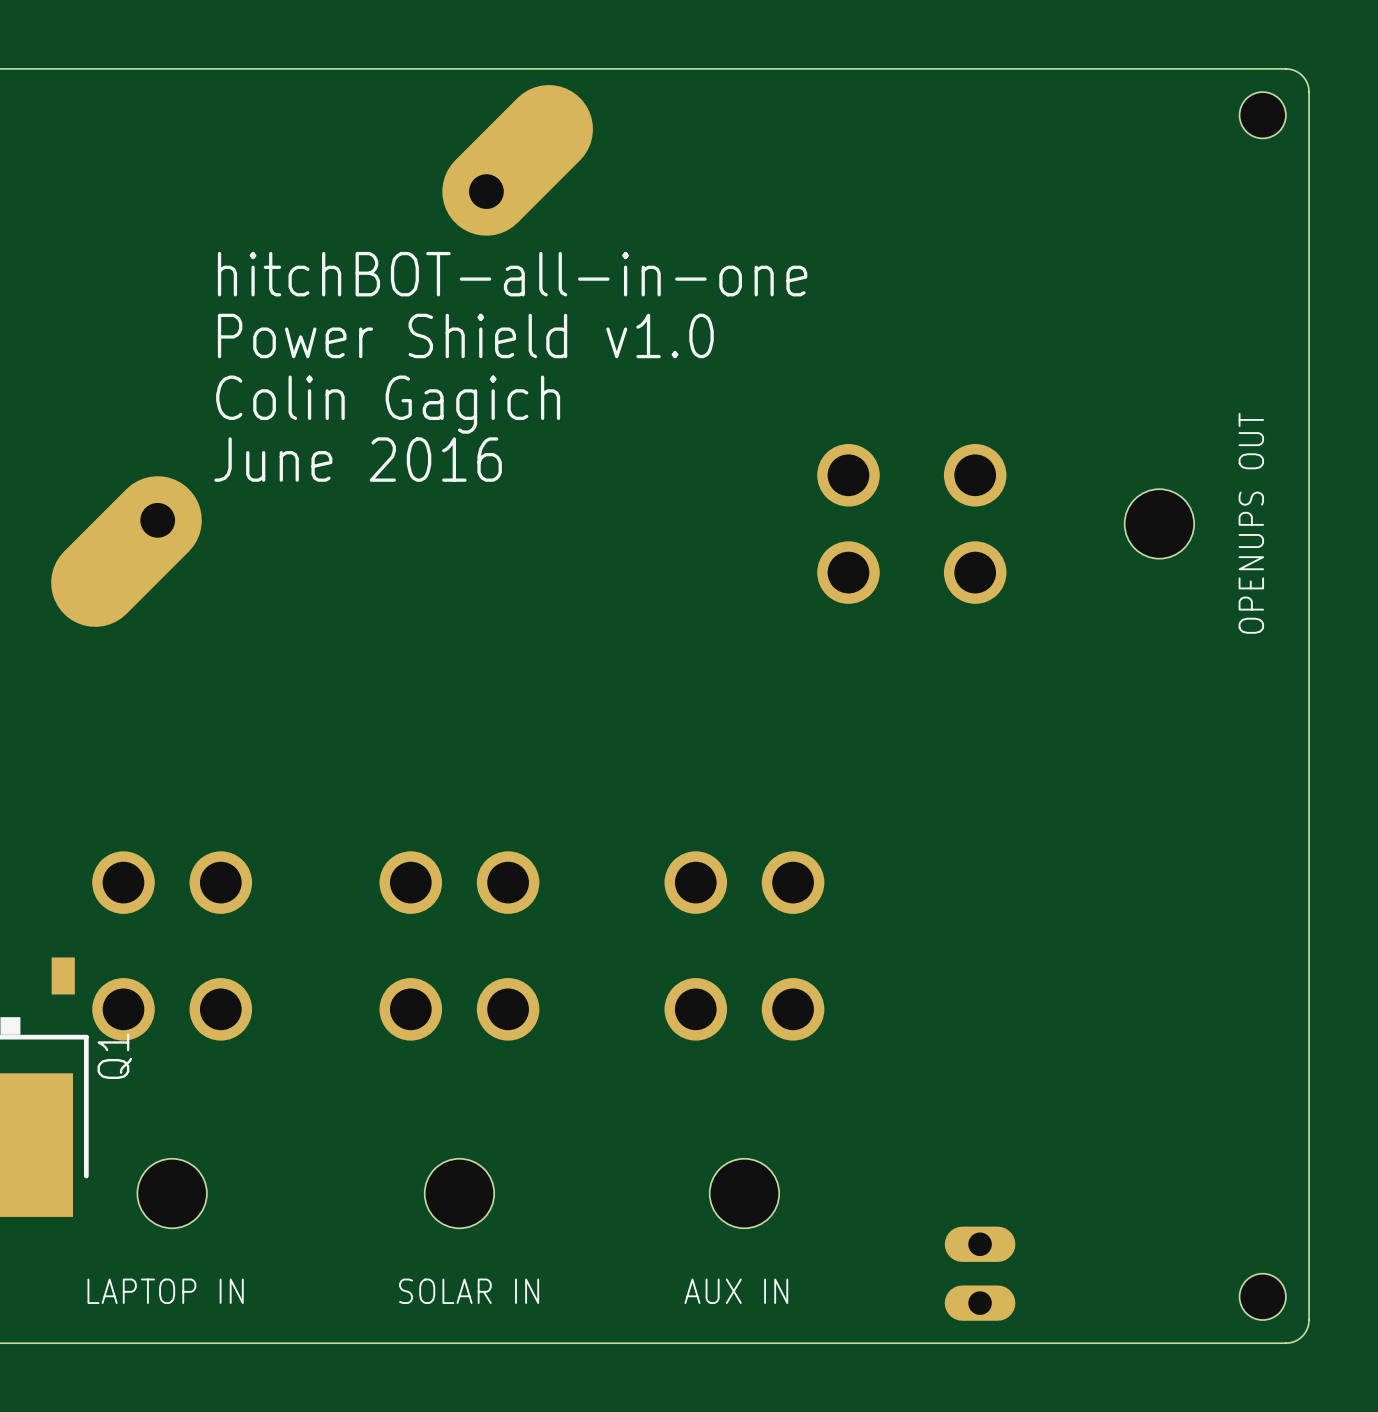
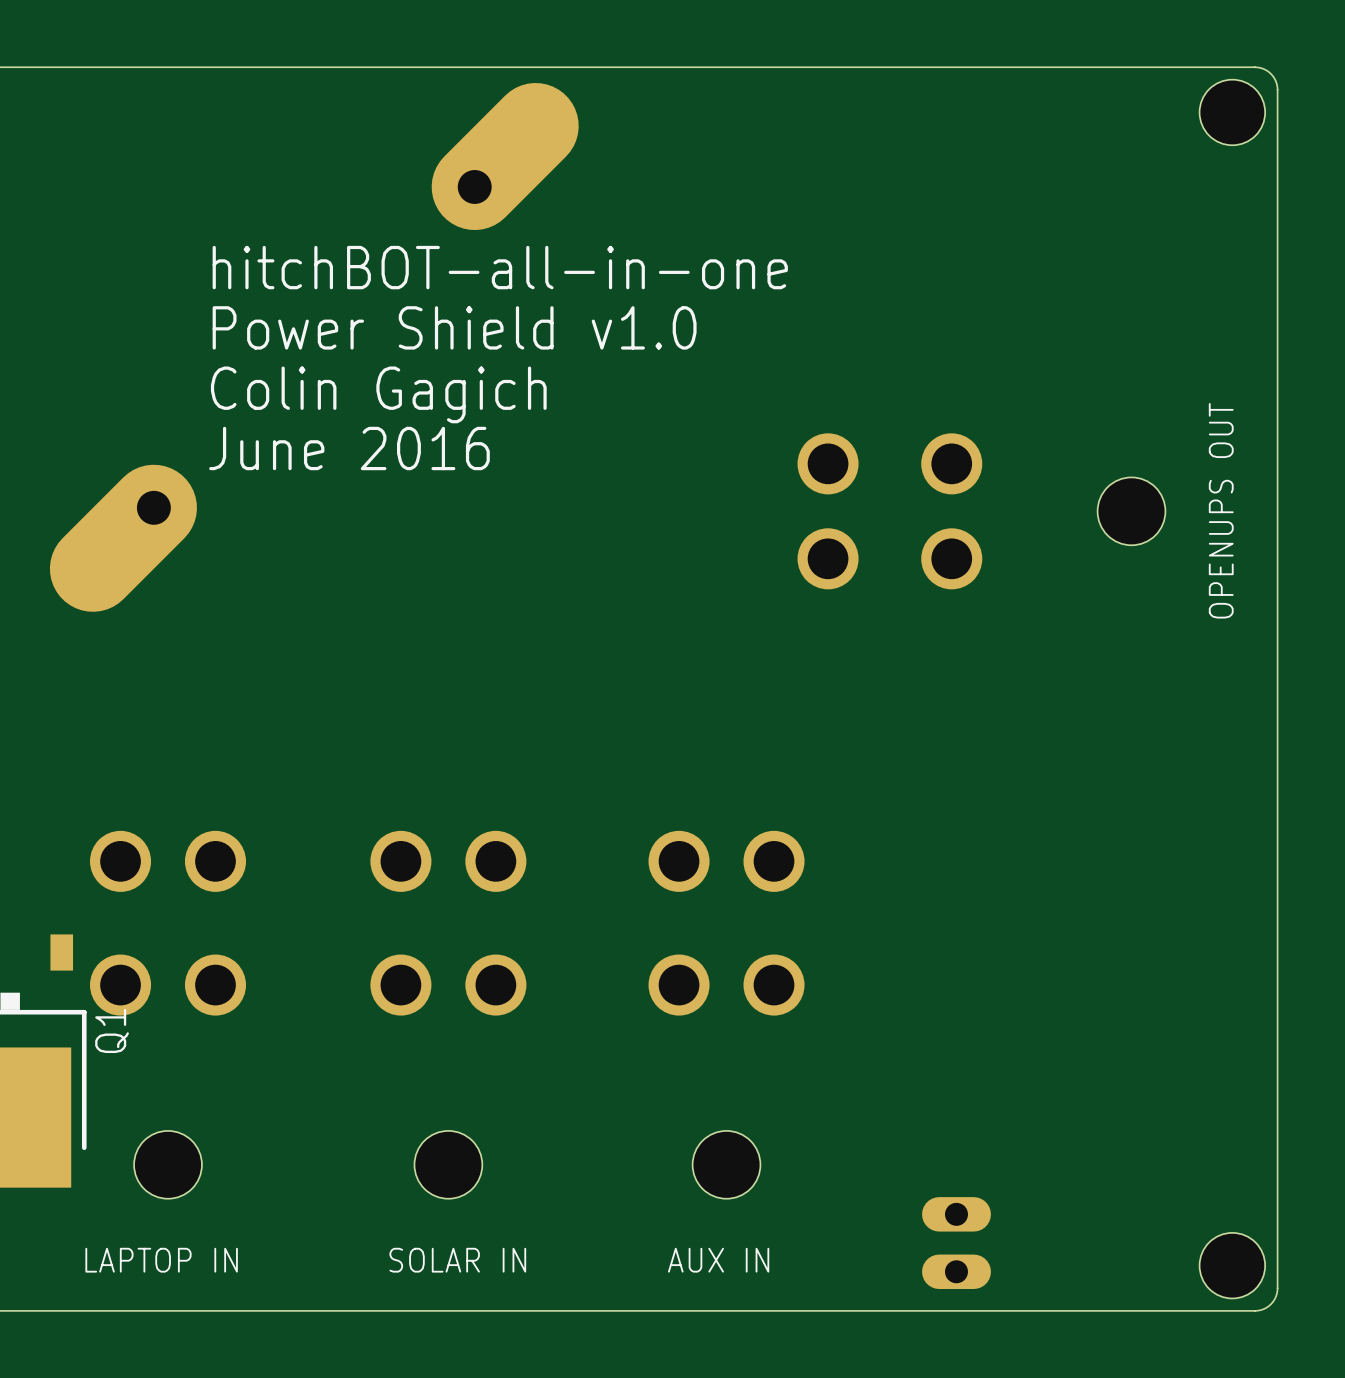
hole size: [1239, 92, 1286, 139] -> [1199, 79, 1266, 146]
hole size: [1239, 1273, 1286, 1321] -> [1199, 1232, 1266, 1299]

